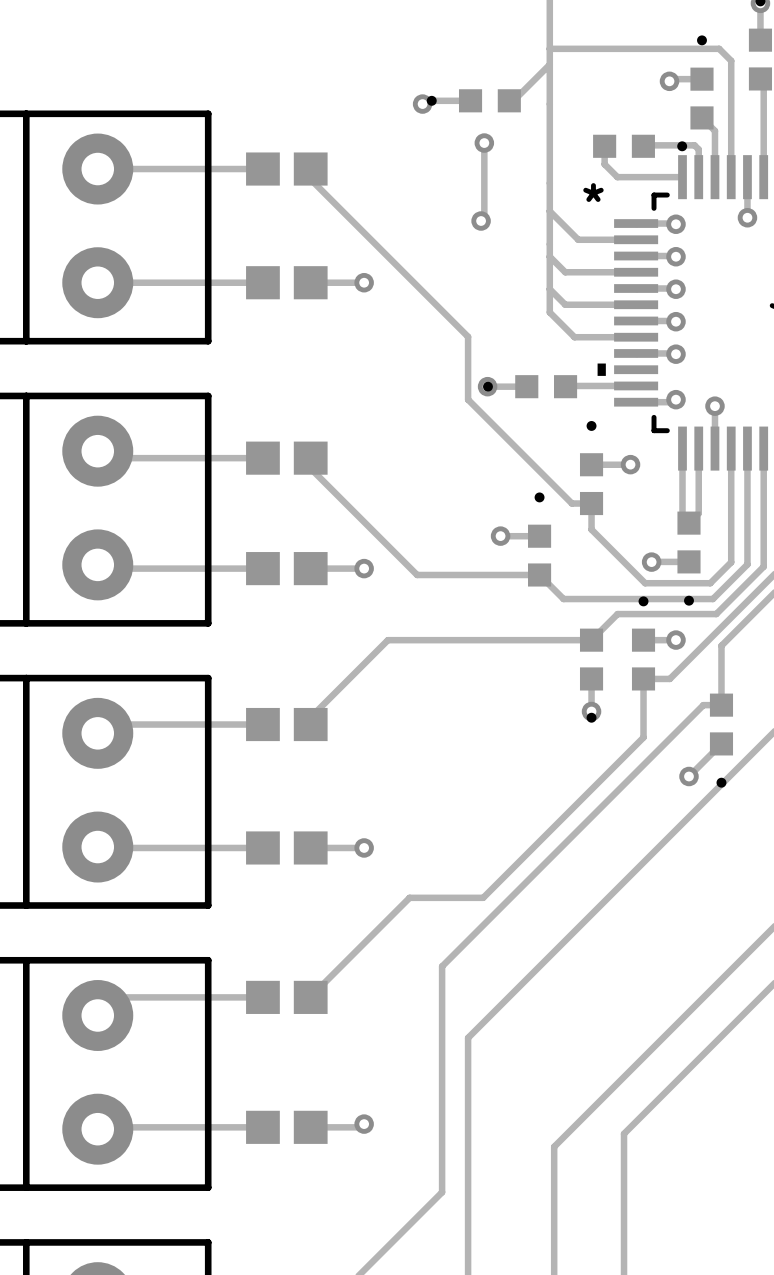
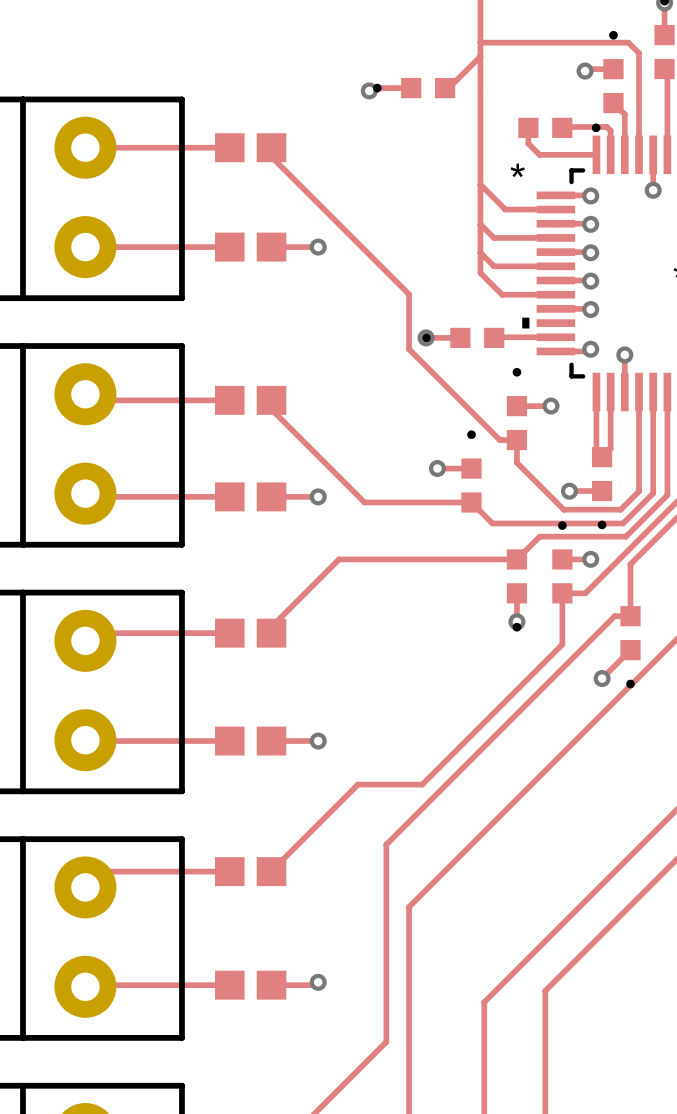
track: (484, 143) (484, 217) (481, 221) -> none
via: (484, 143) -> none
via: (481, 221) -> none

